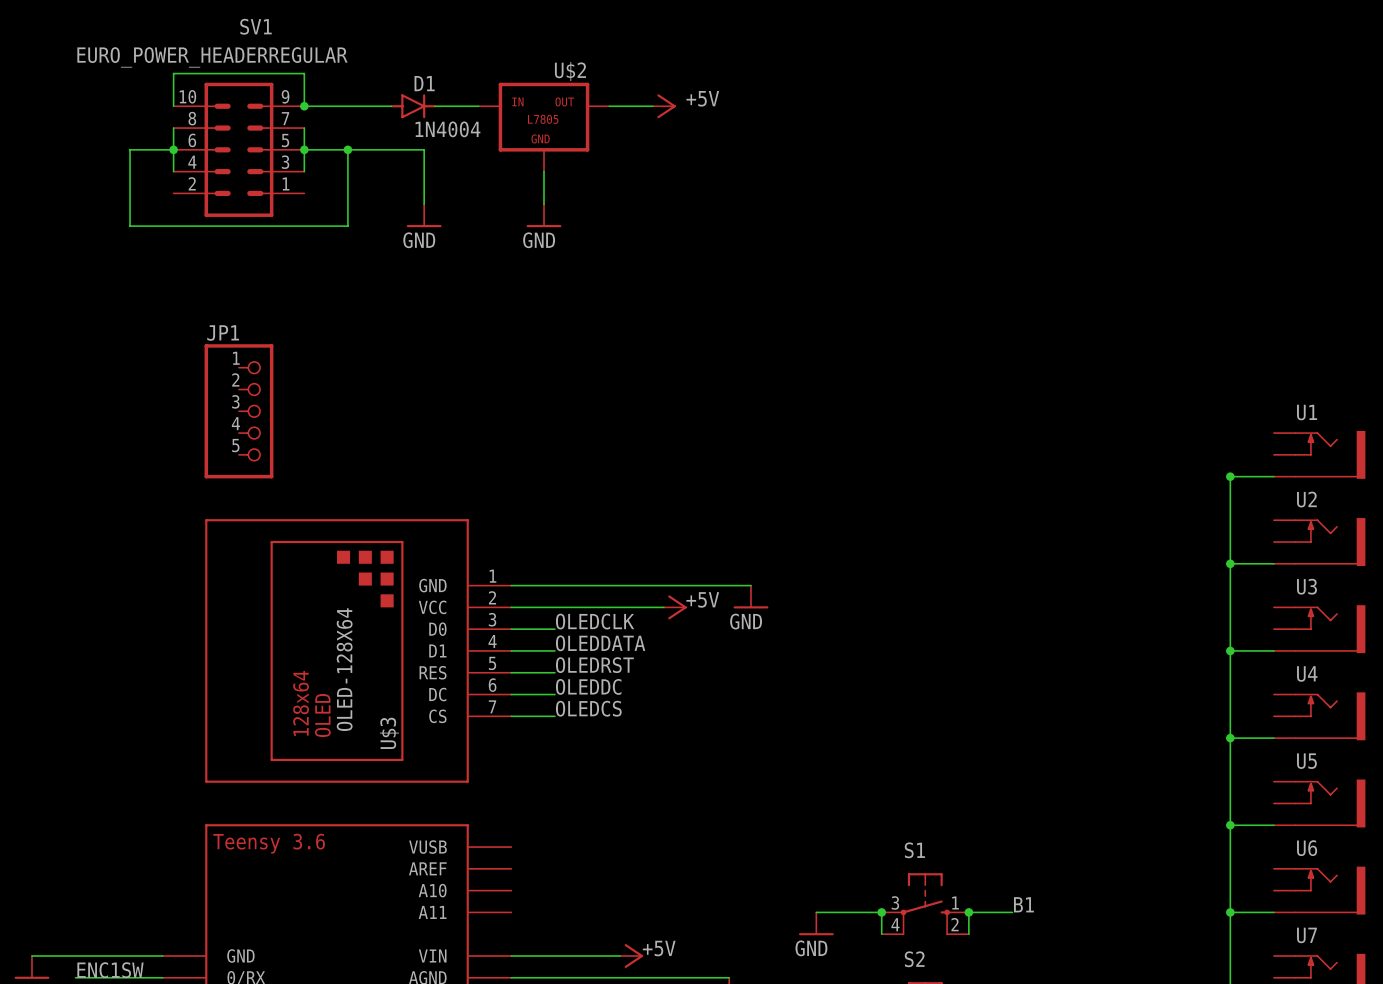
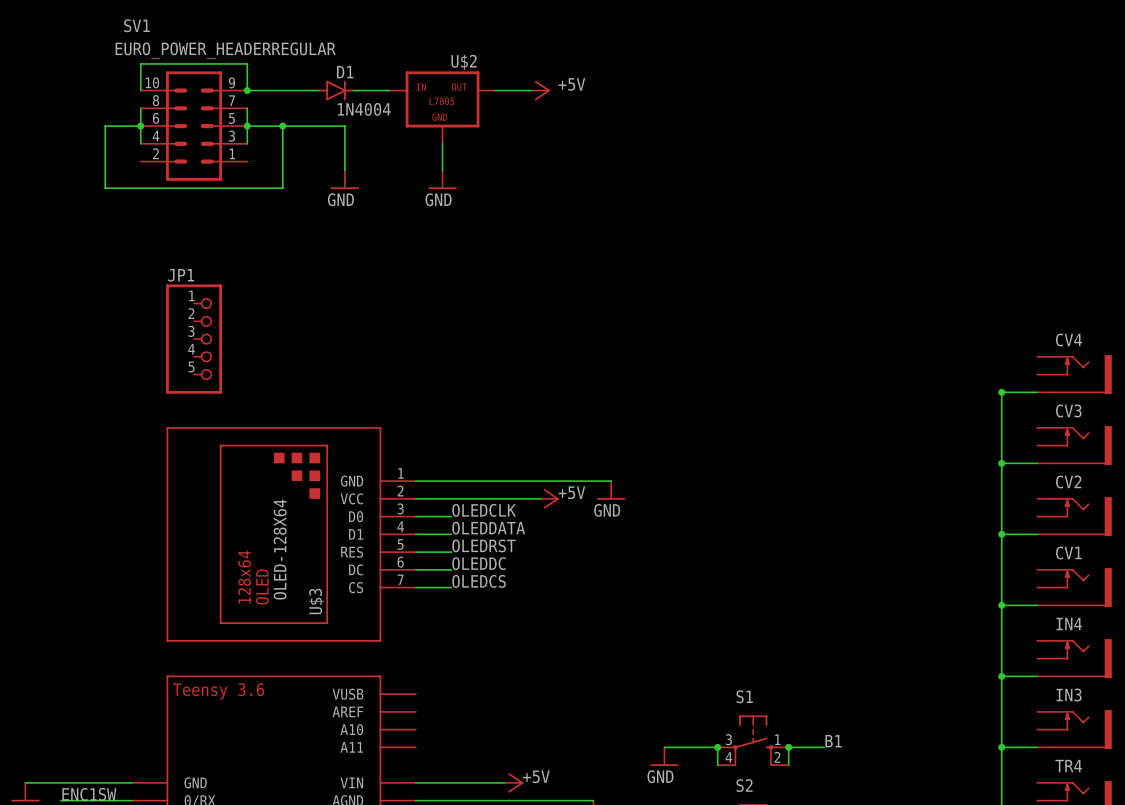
SV1 name position: SV1 (255, 26) -> SV1 (136, 25)
SV1 value position: EURO_POWER_HEADERREGULAR (212, 57) -> EURO_POWER_HEADERREGULAR (225, 50)
U1 name: U1 (1307, 412) -> CV4 (1068, 339)
U2 name: U2 (1306, 499) -> CV3 (1068, 411)
U3 name: U3 (1306, 586) -> CV2 (1068, 482)
U4 name: U4 (1307, 673) -> CV1 (1068, 553)
U5 name: U5 (1306, 761) -> IN4 (1069, 624)
U6 name: U6 (1307, 848) -> IN3 (1069, 695)
U7 name: U7 (1306, 935) -> TR4 (1068, 766)

